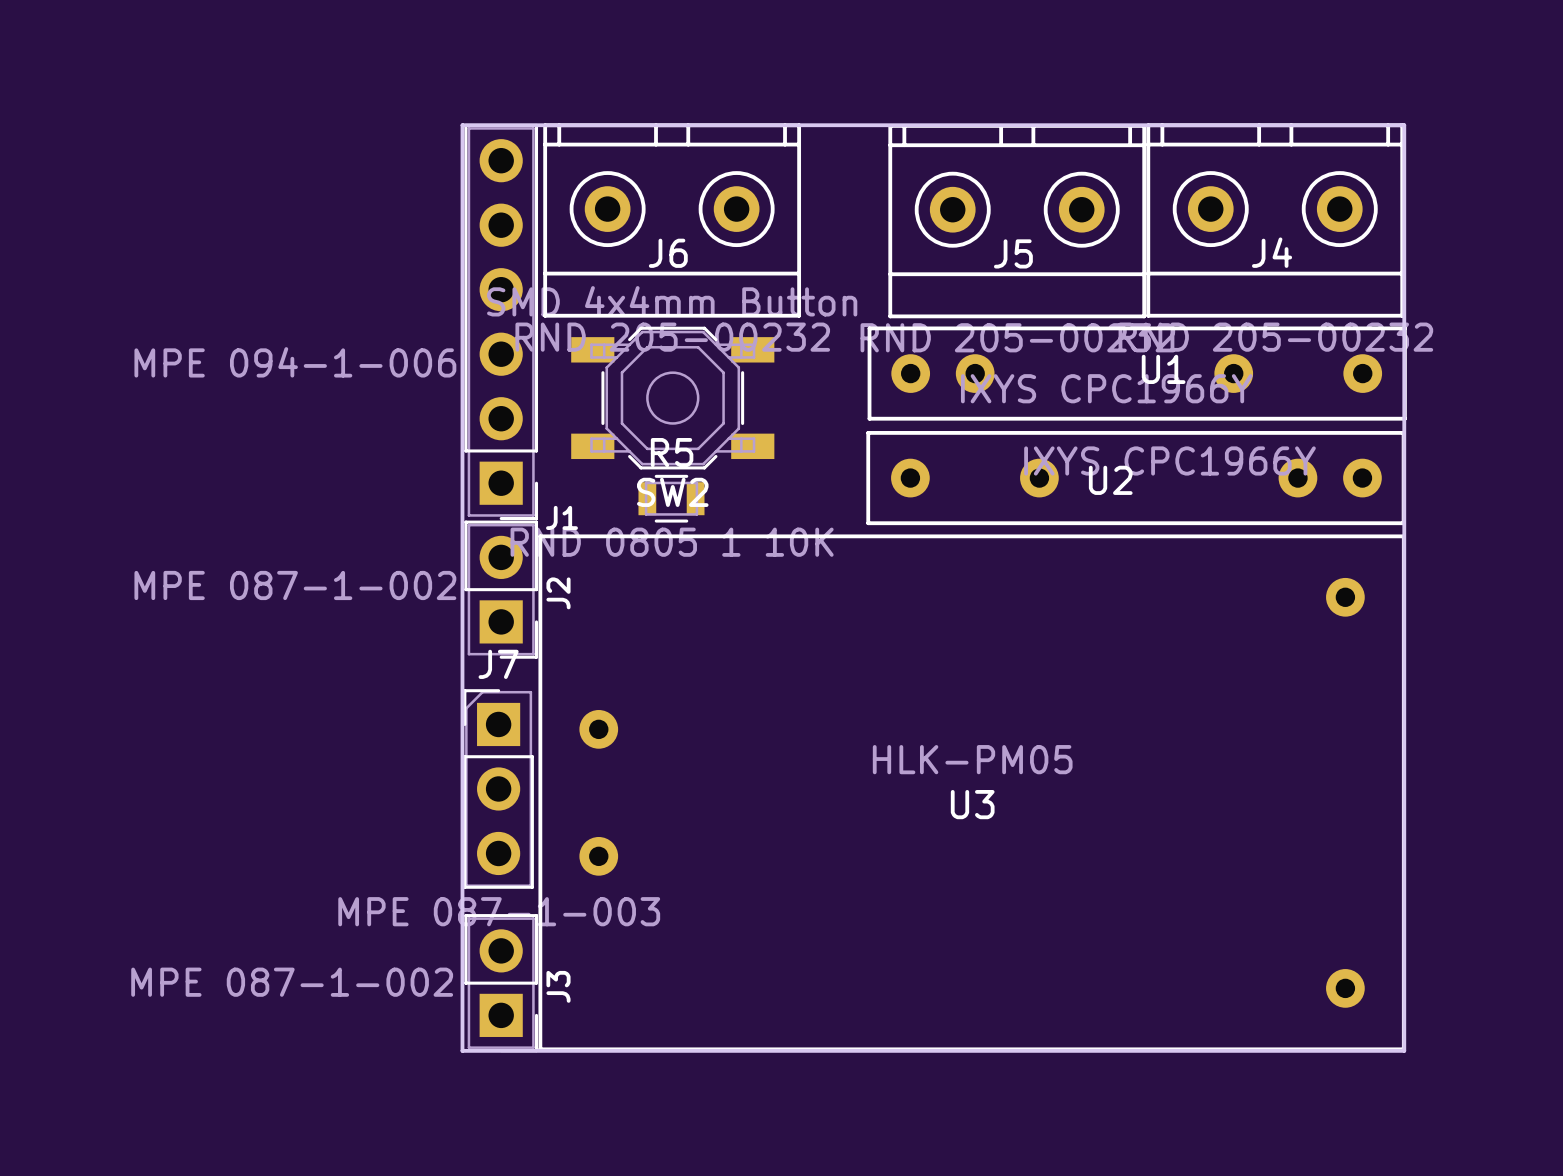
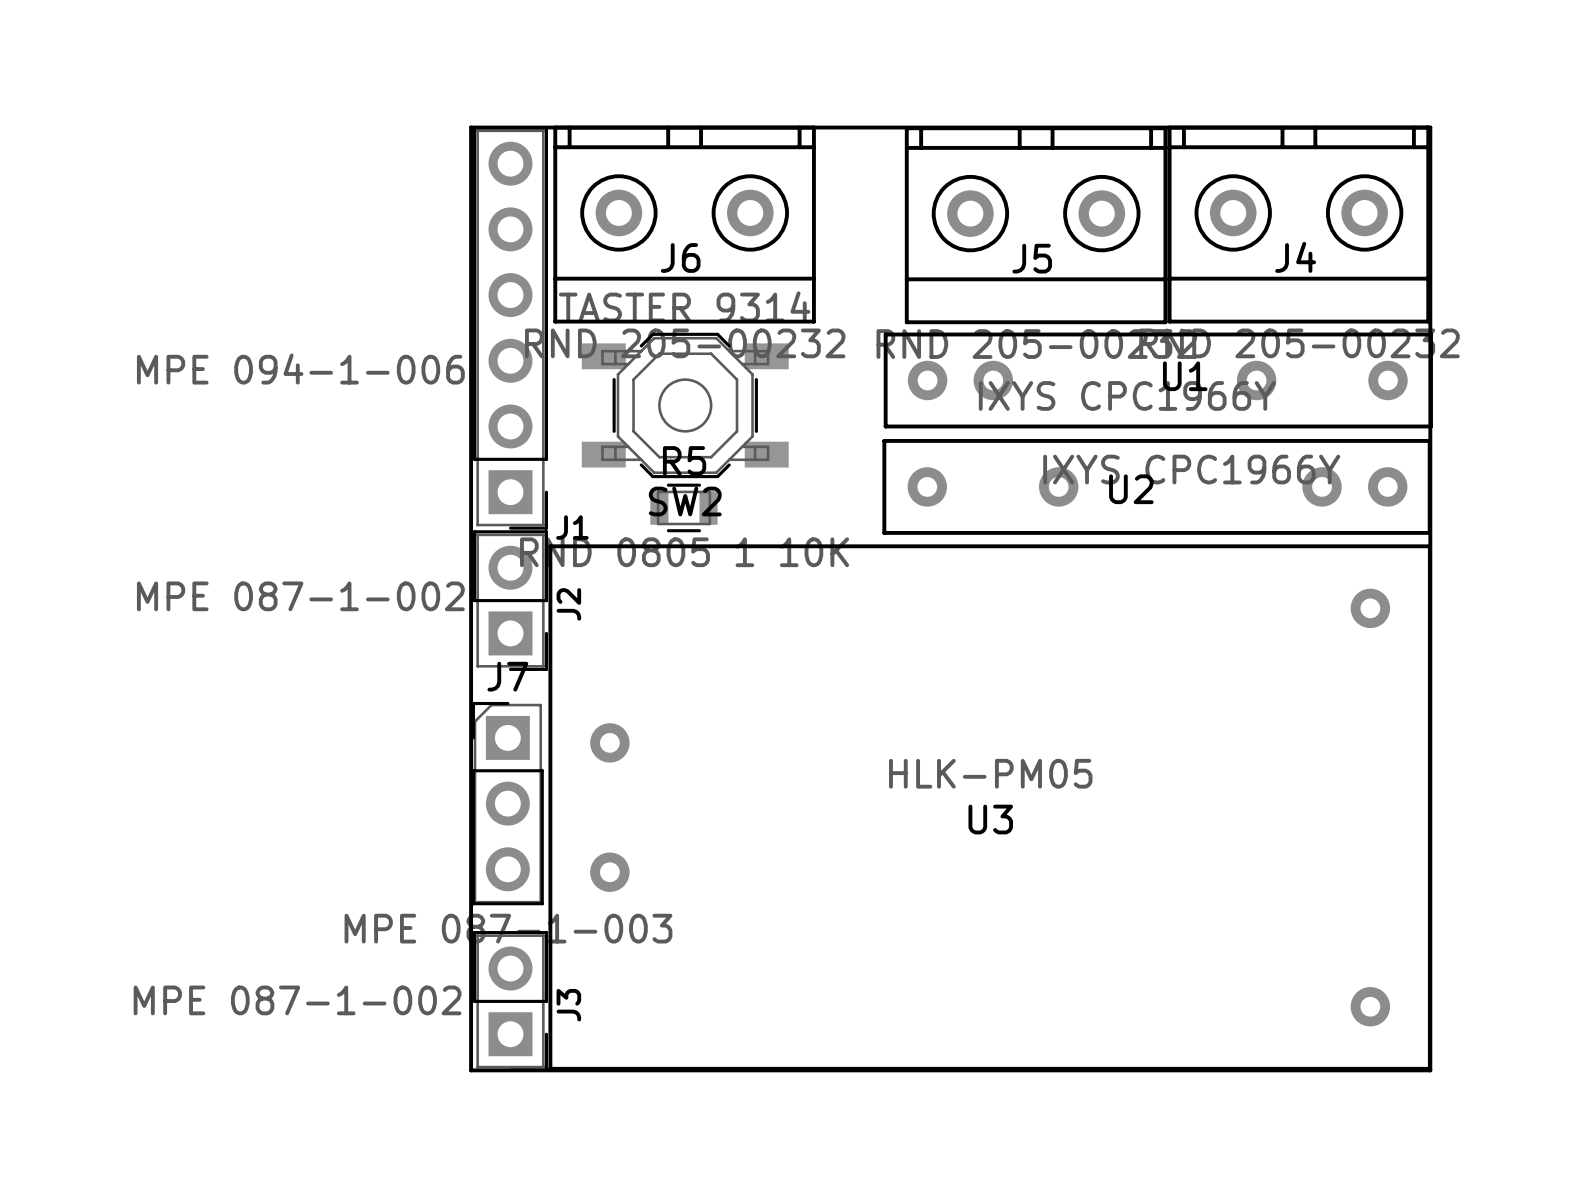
SW2 value: SMD 4x4mm Button (672, 301) -> TASTER 9314 (684, 306)

